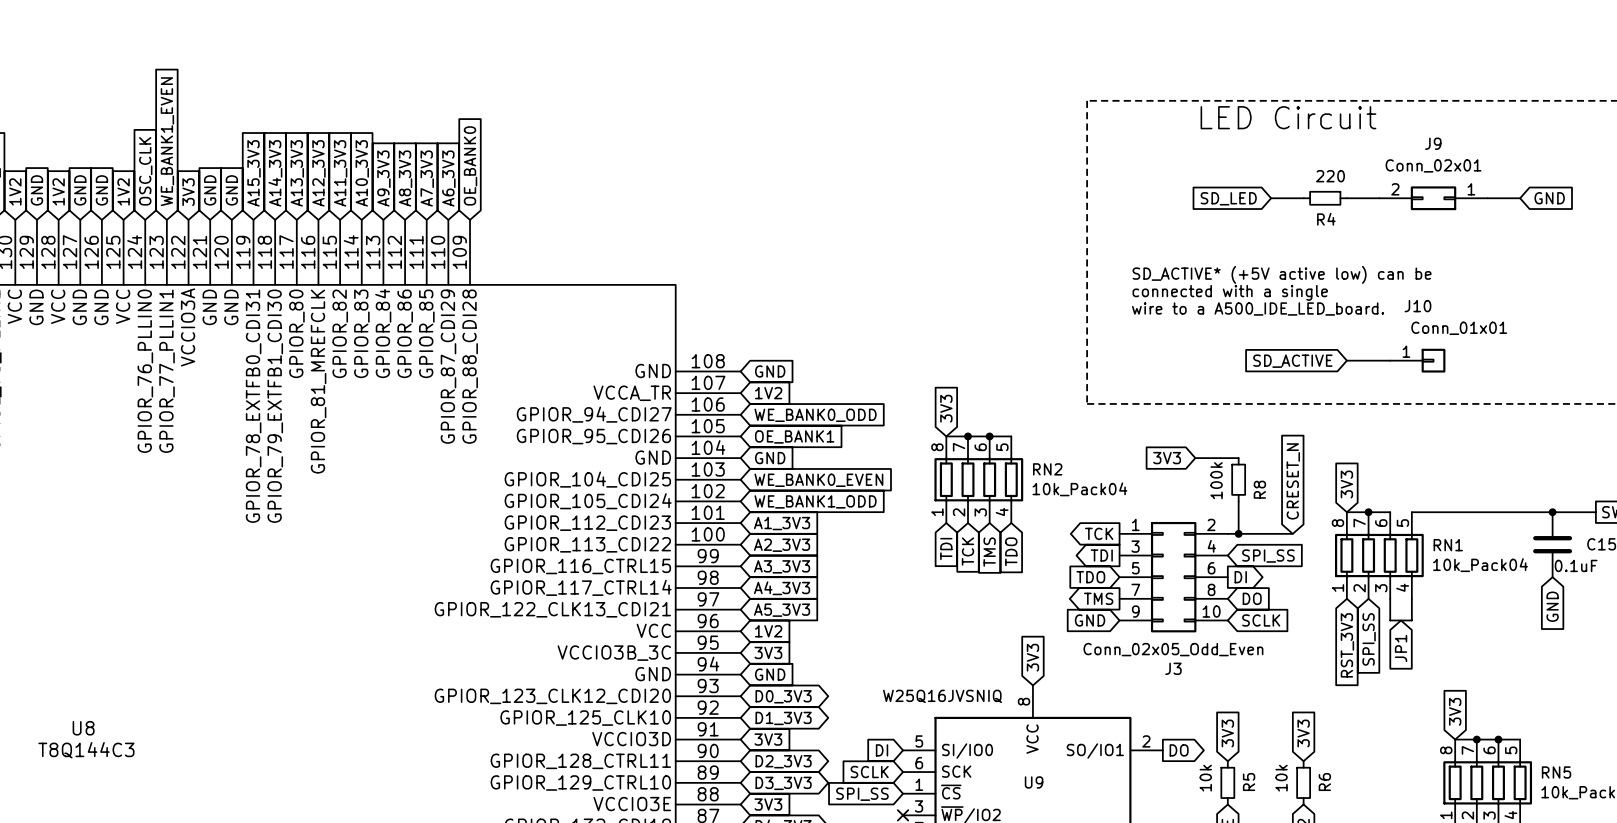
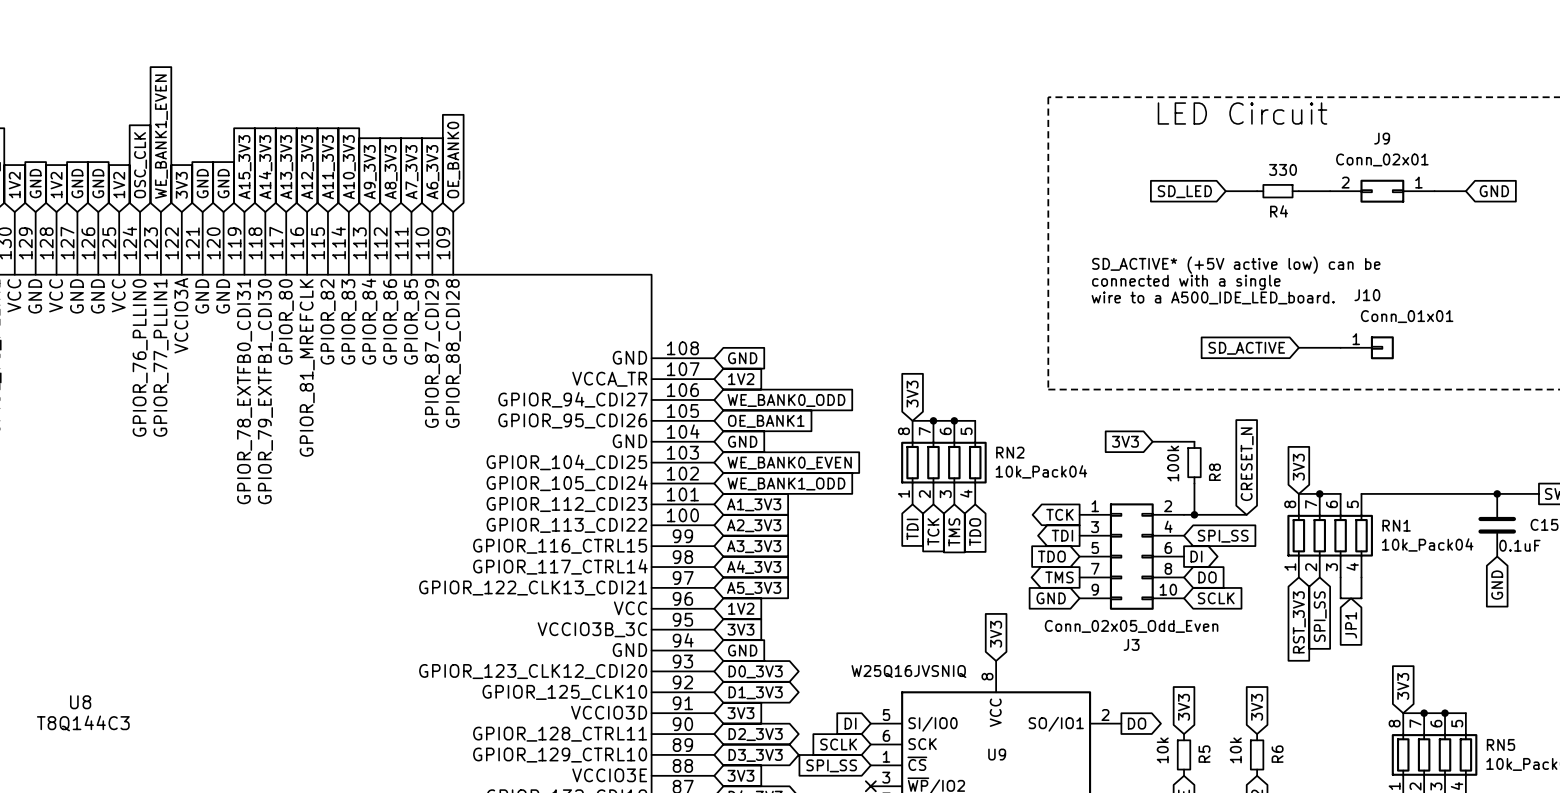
R4 value: 220 (1330, 176) -> 330 (1283, 169)

